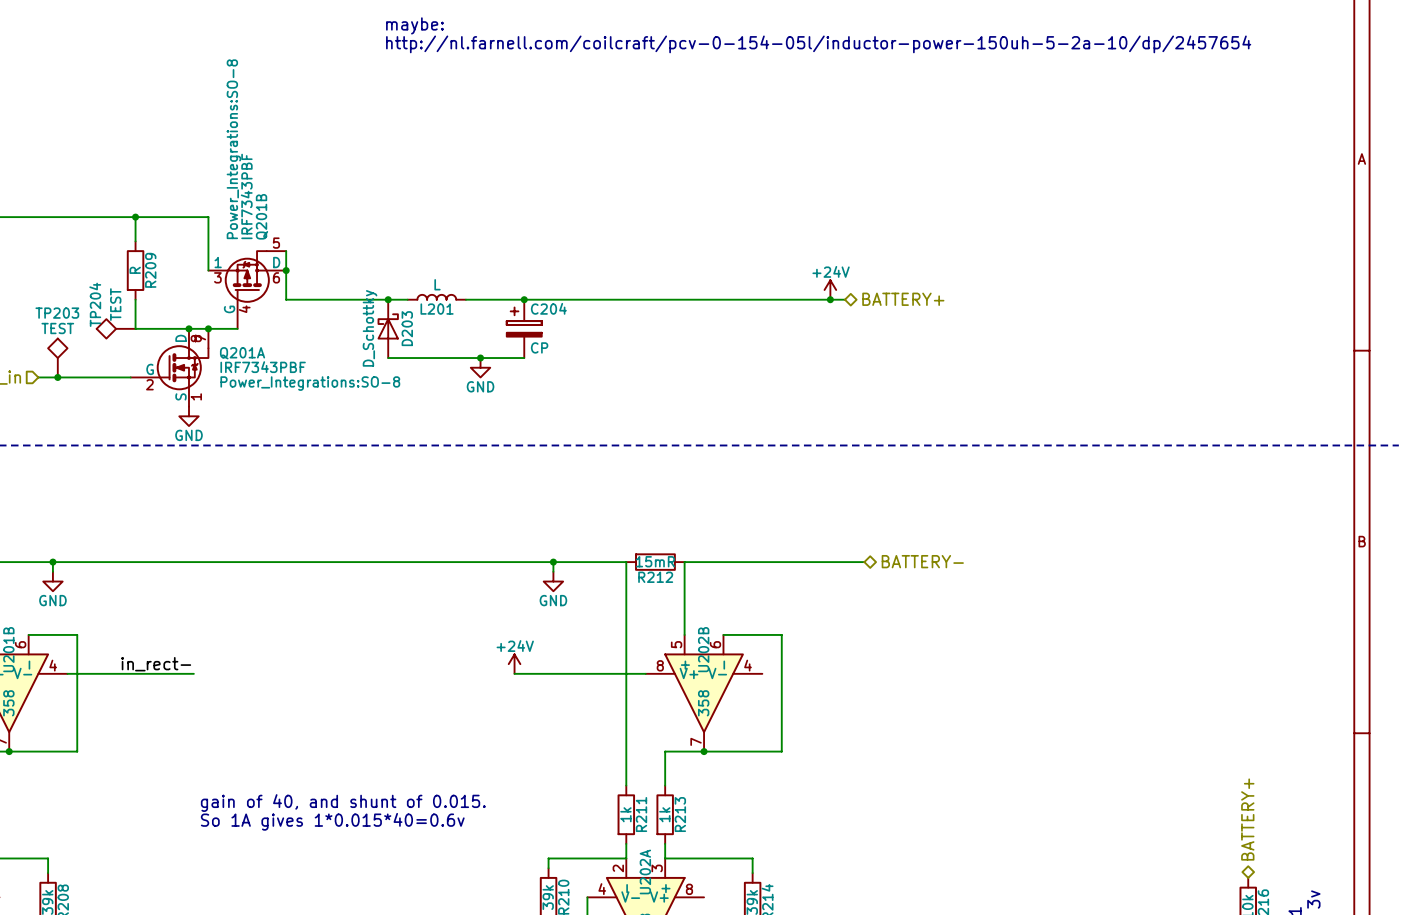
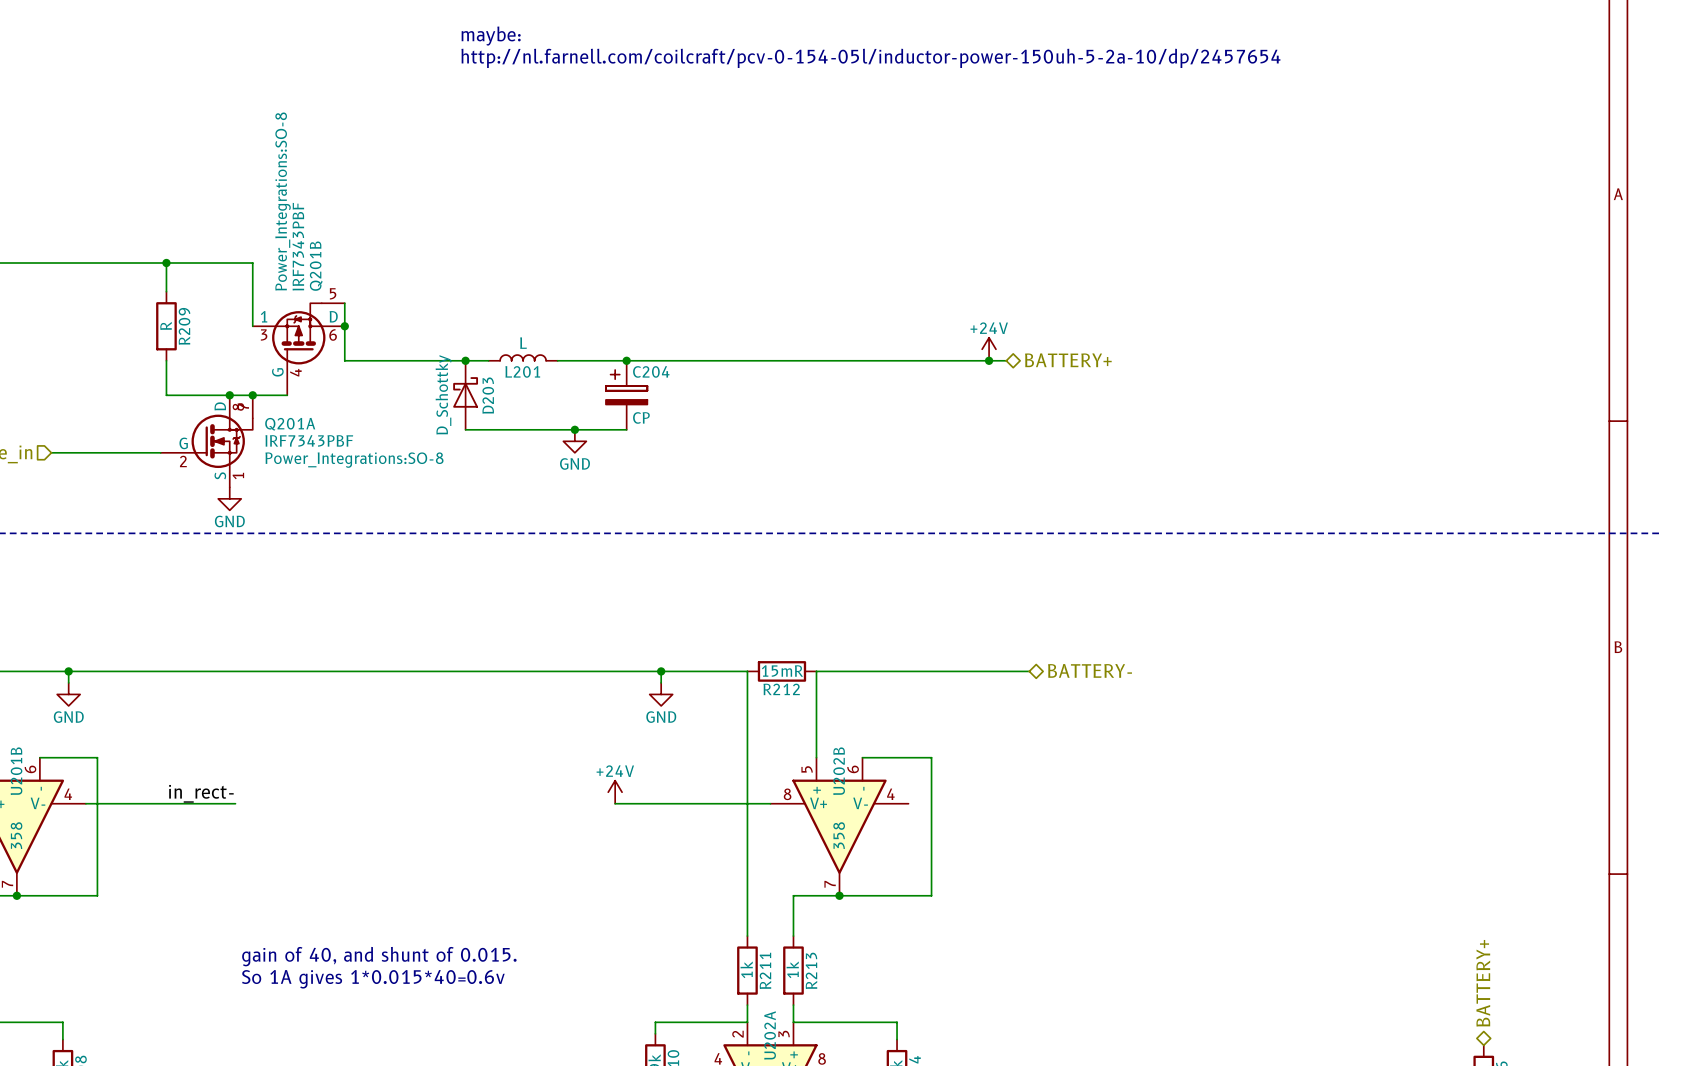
TP204: TEST (116, 328) -> none
TP203: TEST (57, 358) -> none
junction: (57, 377) -> none

